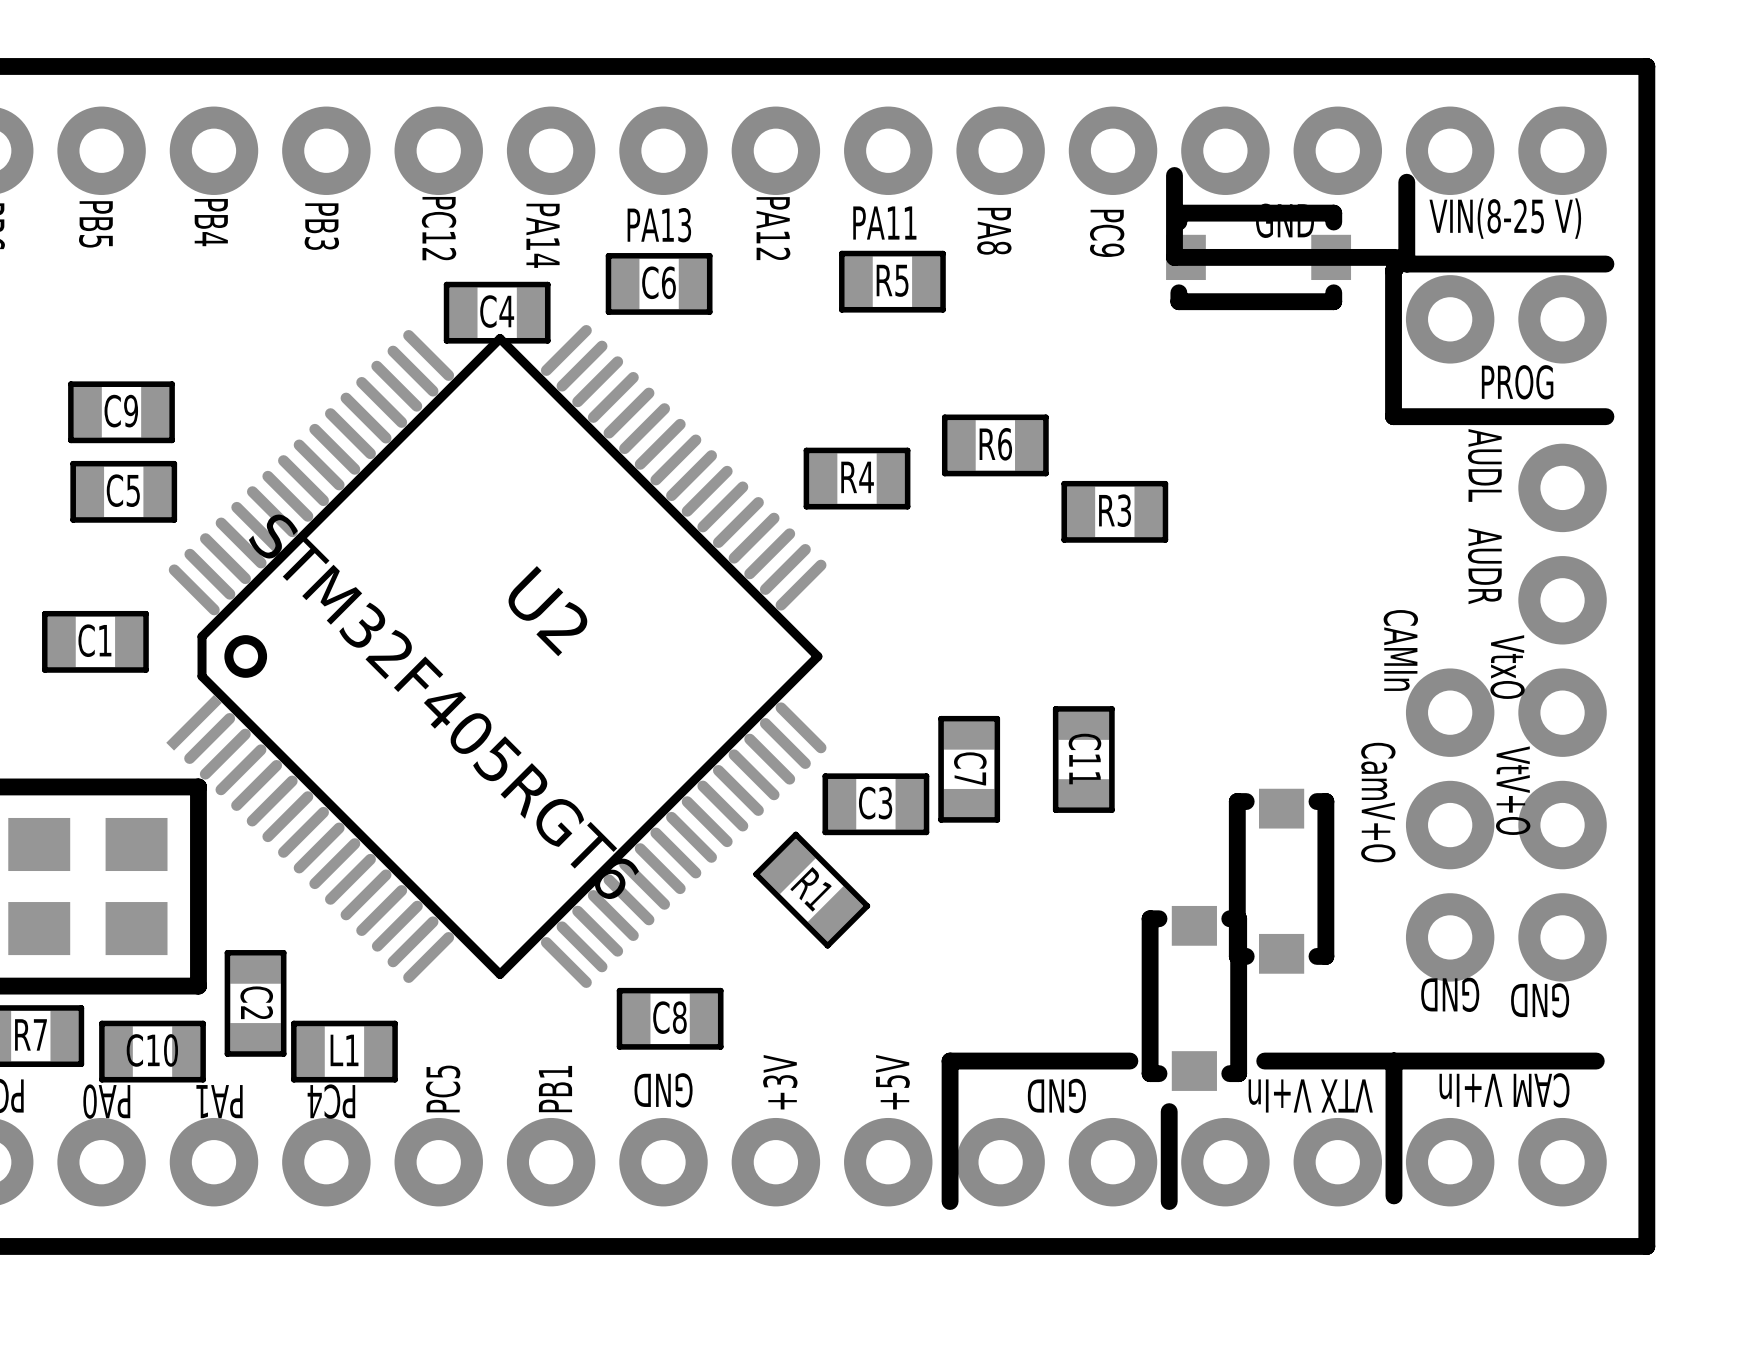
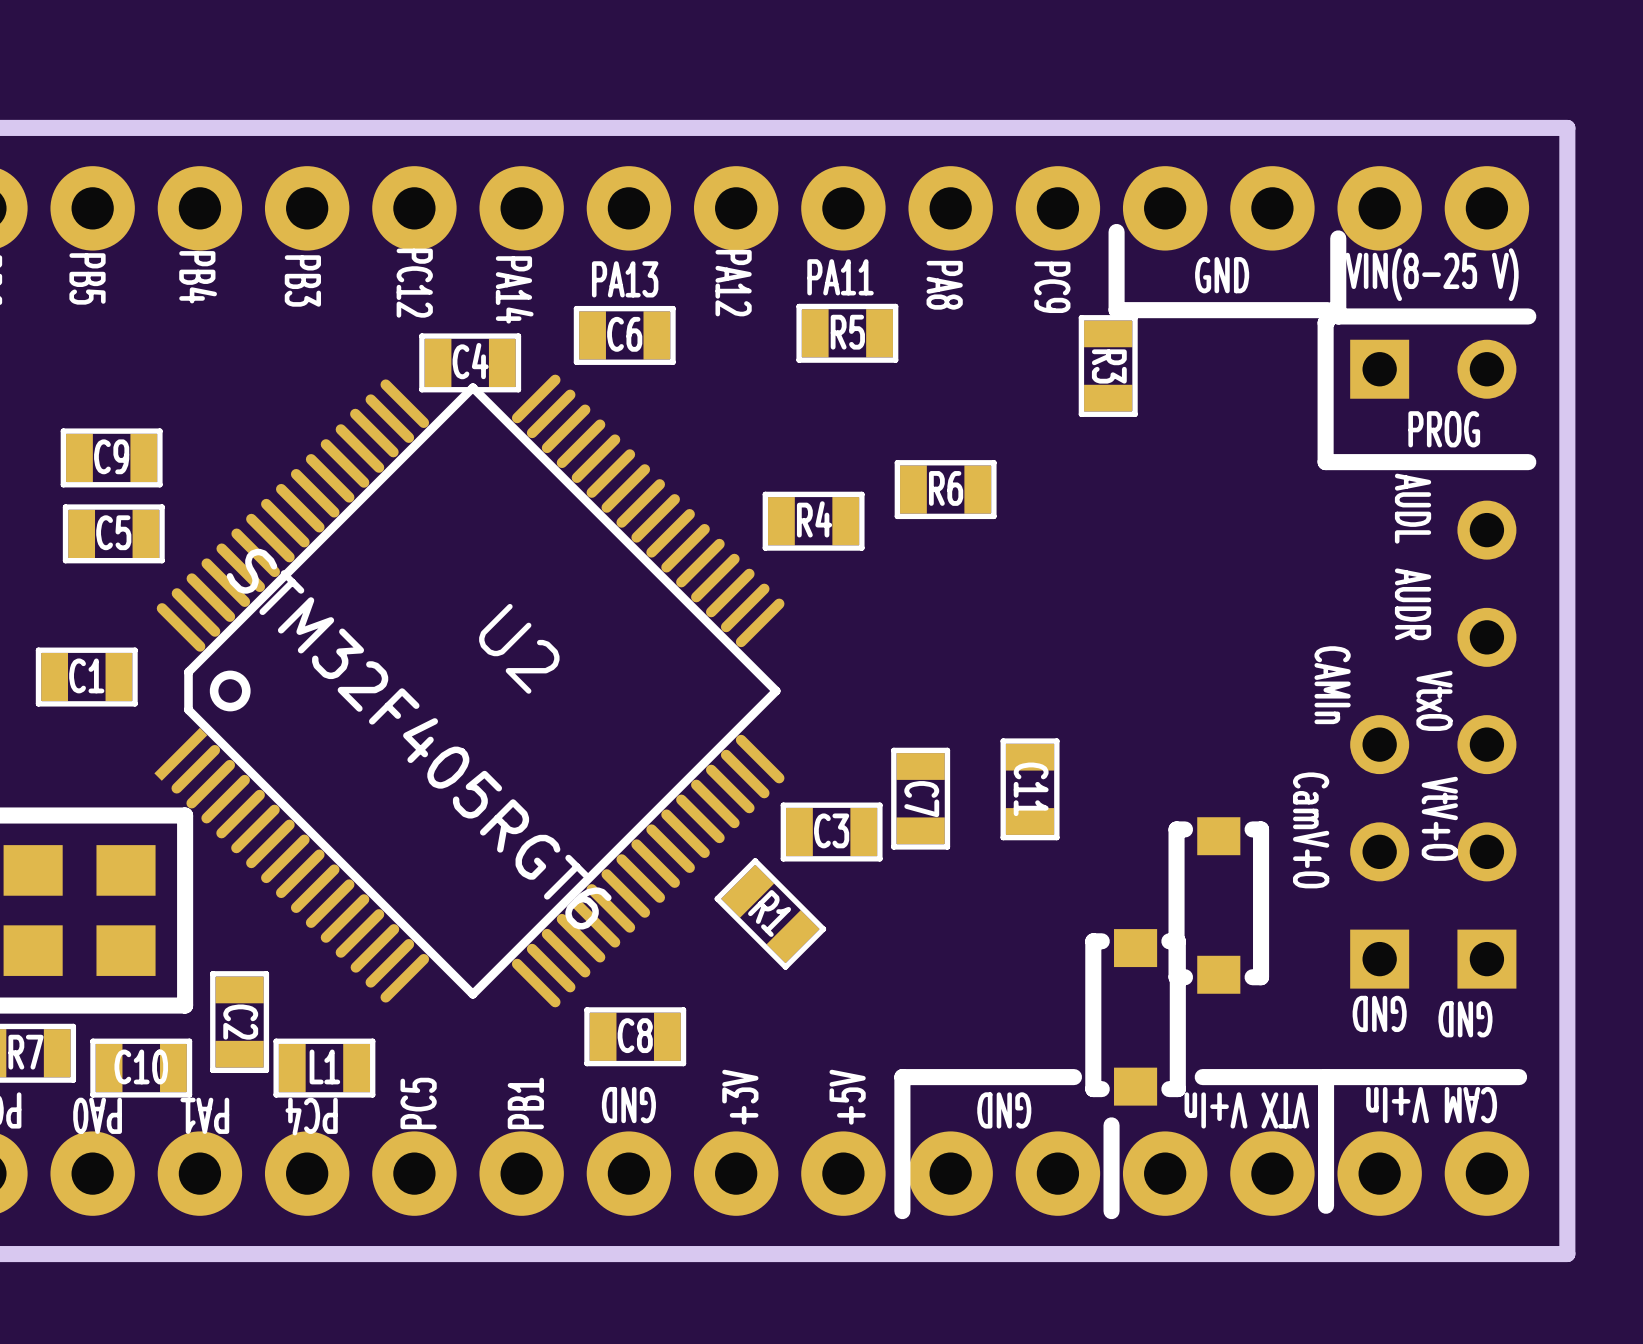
part: (1258, 257) -> none
part footprint: [1405, 275, 1607, 364] -> [1350, 339, 1517, 399]
part footprint: [1518, 443, 1607, 982] -> [1457, 500, 1517, 989]
R3 rotation: 0° (1114, 511) -> 90° clockwise (1108, 366)
R3 position: (1114, 511) -> (1108, 366)
part footprint: [1405, 668, 1495, 982] -> [1350, 715, 1410, 989]

